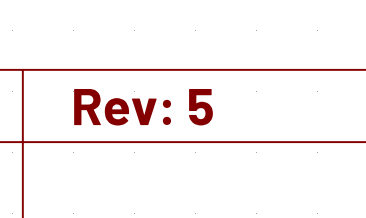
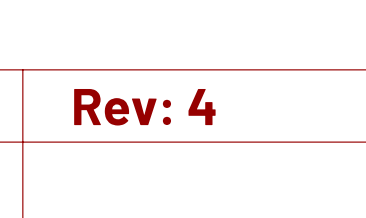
title block: Rev: 5 (143, 107) -> Rev: 4 (144, 107)

